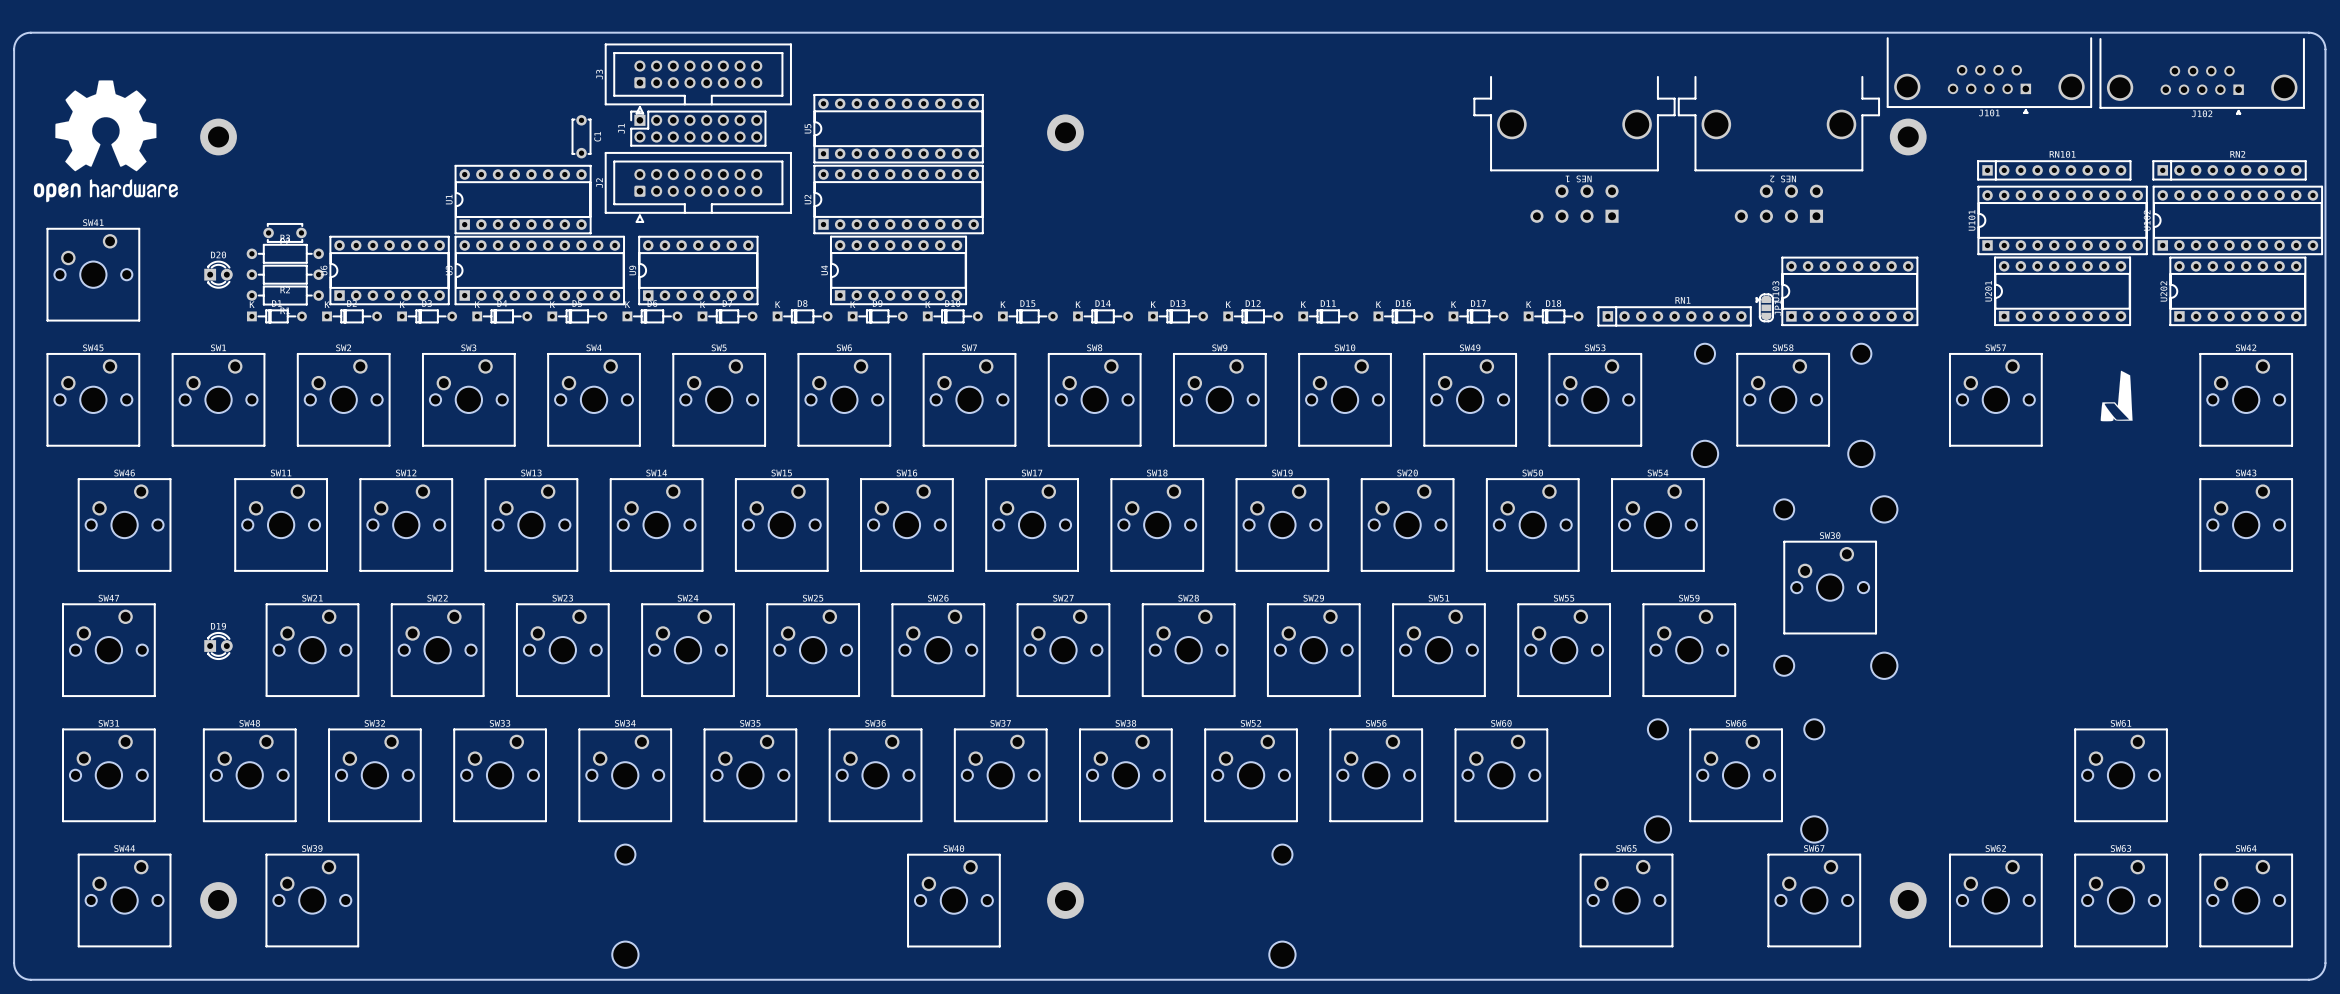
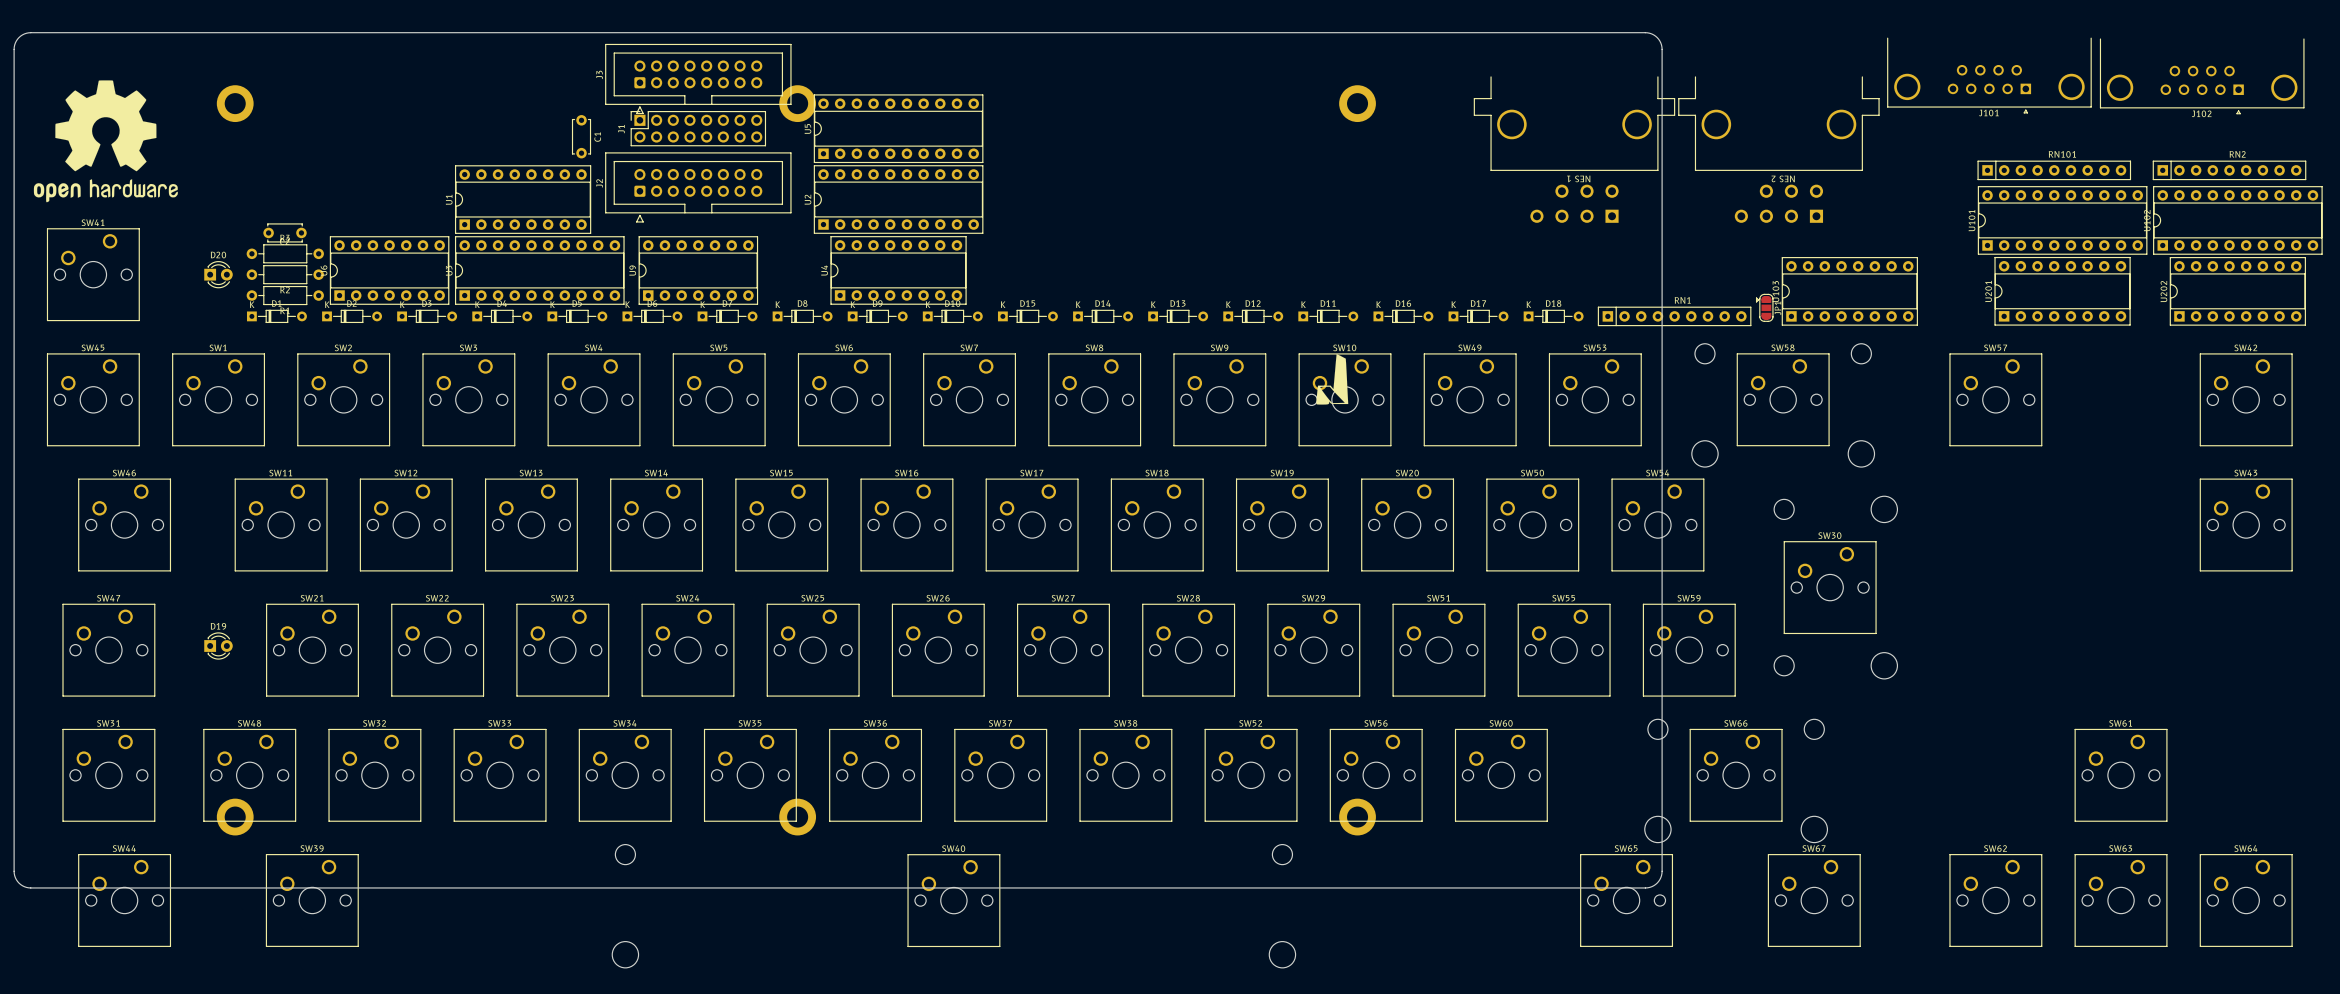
board edge: (1645, 32) (2308, 32) (2317, 34) (2322, 39) (2325, 49) (2325, 963) (2323, 971) (2318, 976) (2308, 979) (30, 979) (18, 974) (14, 965) (14, 871) -> (1645, 32) (1657, 37) (1662, 49) (1662, 871) (1659, 879) (1653, 885) (1645, 887) (30, 887) (18, 883) (14, 871)
part: none -> (797, 103)
part: none -> (1357, 103)
part: (1065, 132) -> none
part position: (218, 136) -> (235, 103)
part: (1908, 136) -> none
drawing: none -> [1316, 354, 1349, 405]
drawing: [2100, 370, 2133, 422] -> none
part: none -> (797, 817)
part: none -> (1357, 817)
part position: (218, 900) -> (235, 817)
part: (1065, 900) -> none
part: (1908, 900) -> none

